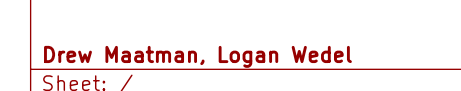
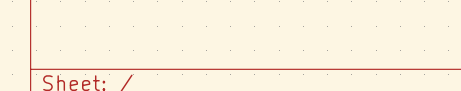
title block: Drew Maatman, Logan Wedel (197, 56) -> none

